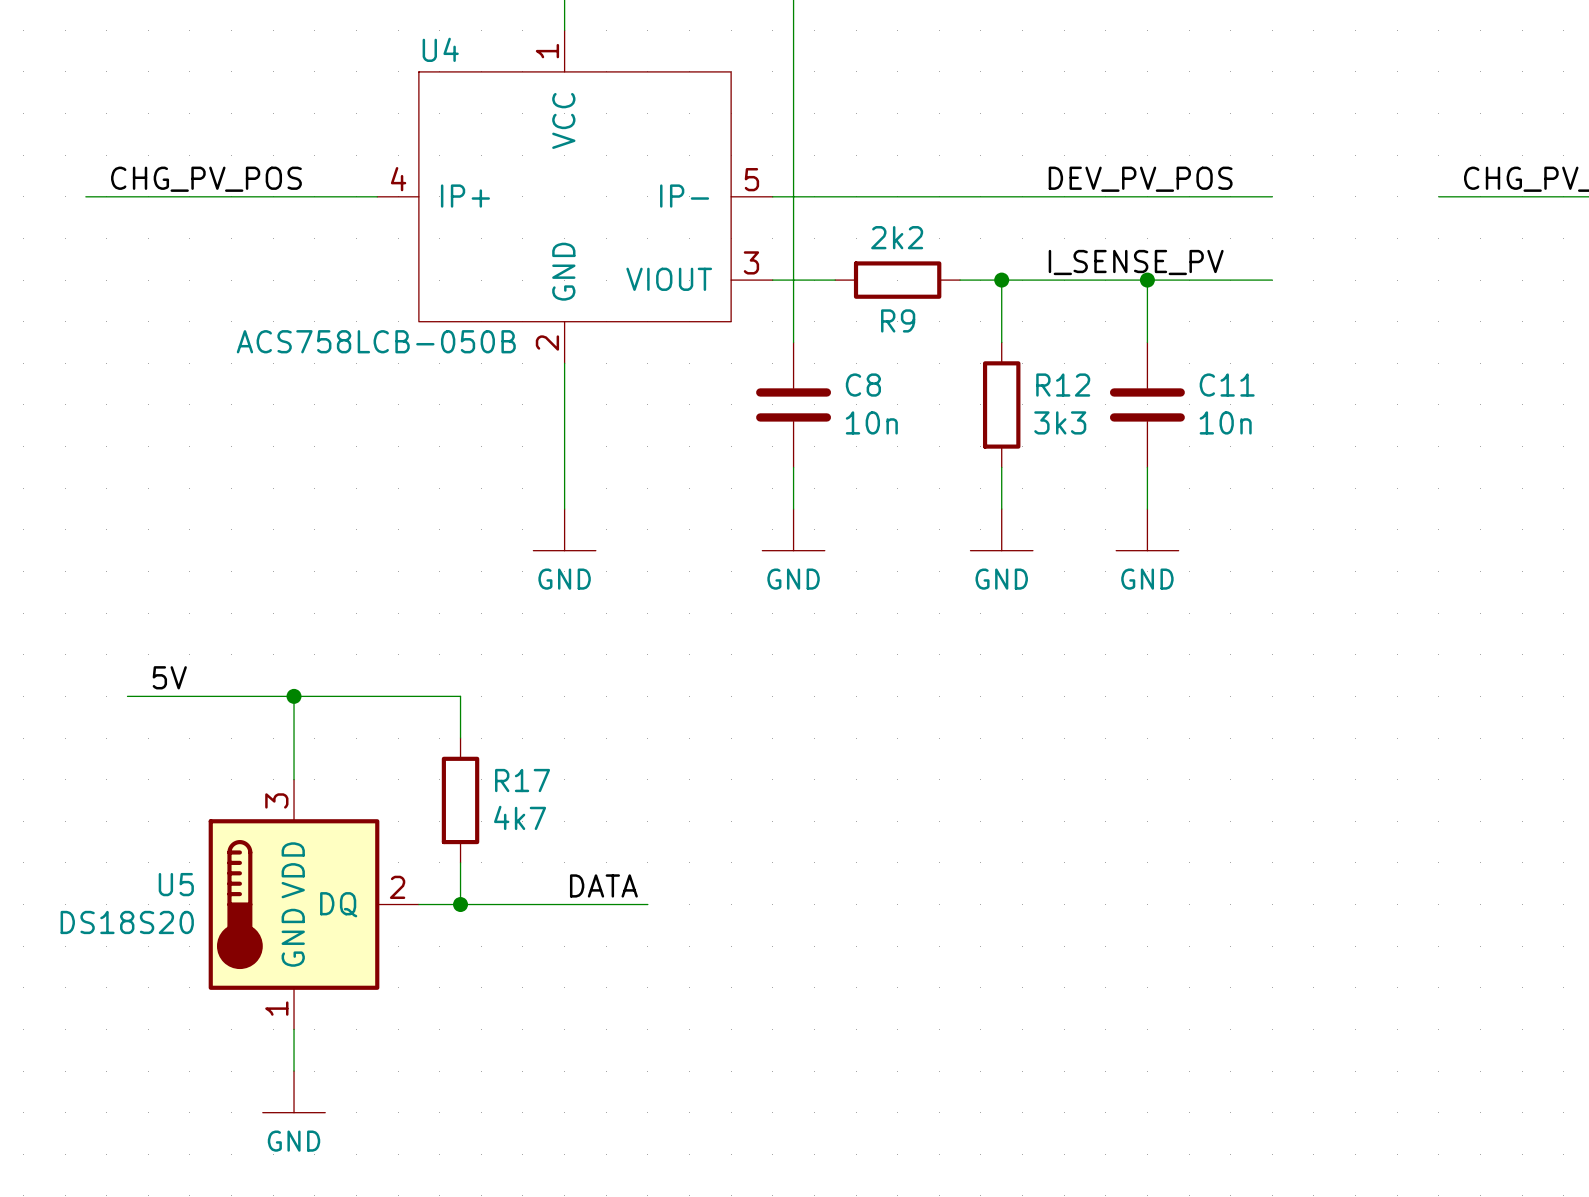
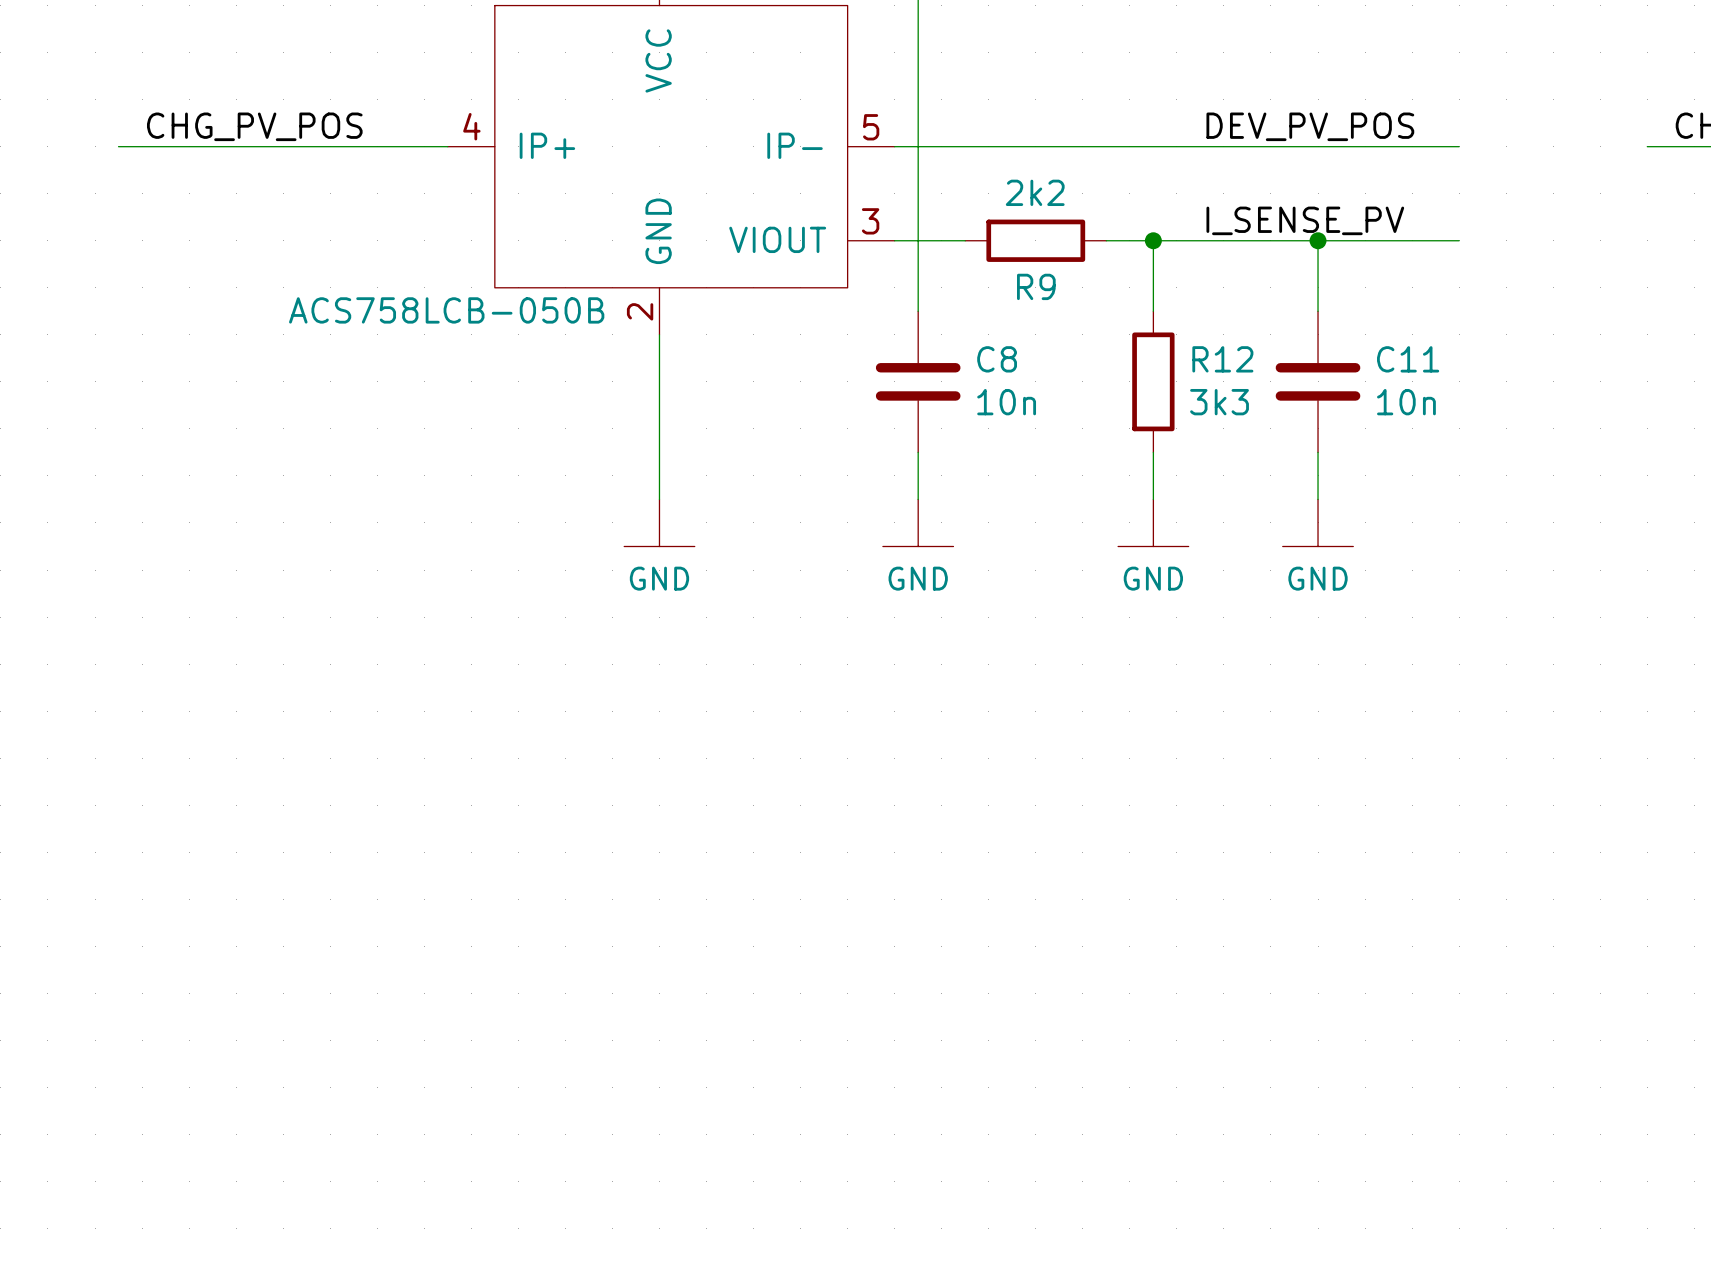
label: 5V (169, 677) -> none
wire: (127, 696) (460, 696) (460, 738) -> none
wire: (294, 696) (294, 779) -> none
junction: (294, 696) -> none
R17: 4k7 (460, 800) -> none
wire: (460, 862) (460, 904) -> none
label: DATA (603, 885) -> none
U5: DS18S20 (313, 904) -> none
wire: (418, 904) (647, 904) -> none
junction: (460, 904) -> none
wire: (294, 1029) (294, 1071) -> none
power symbol: GND (294, 1091) -> none

